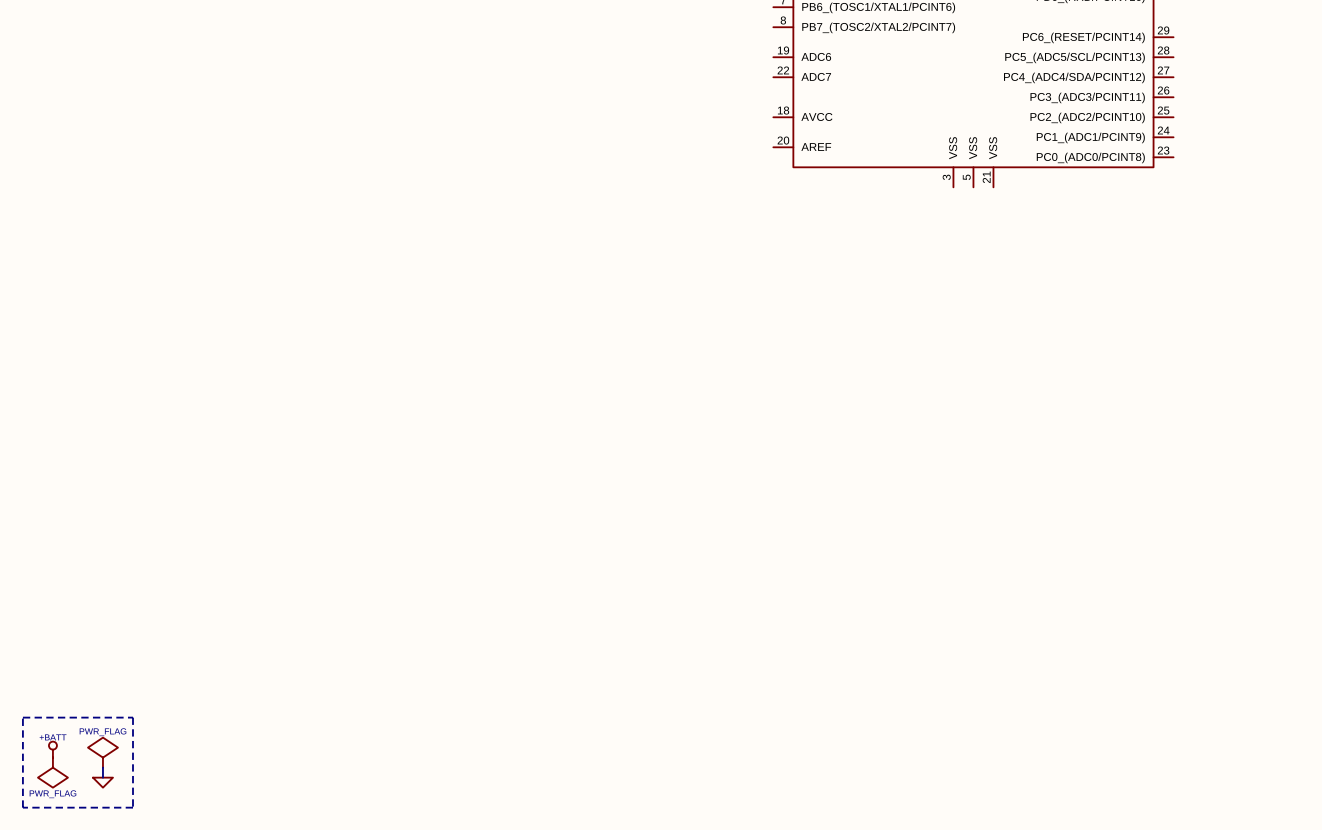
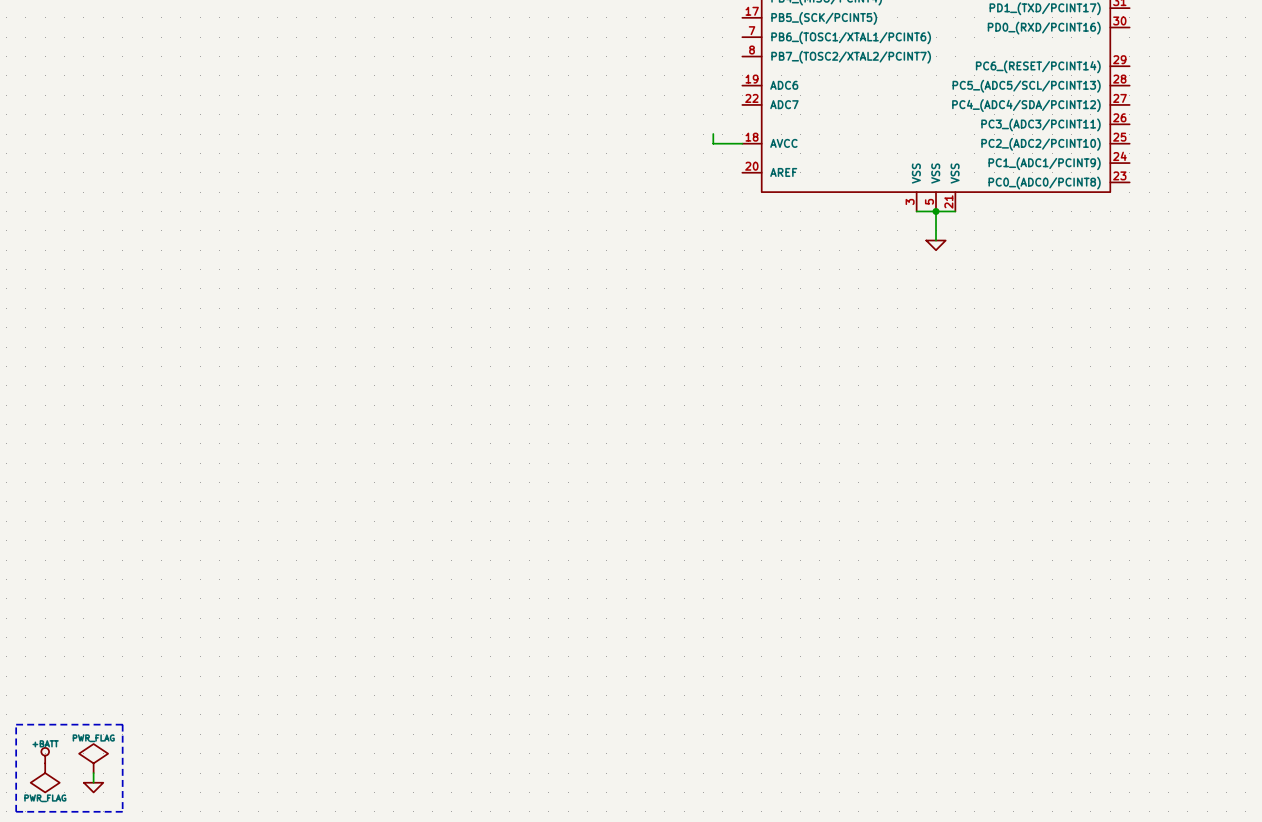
wire: none -> (713, 134) (713, 143) (742, 143)
wire: none -> (916, 211) (955, 211)
wire: none -> (936, 211) (936, 240)
junction: none -> (936, 211)
power symbol: none -> (936, 245)

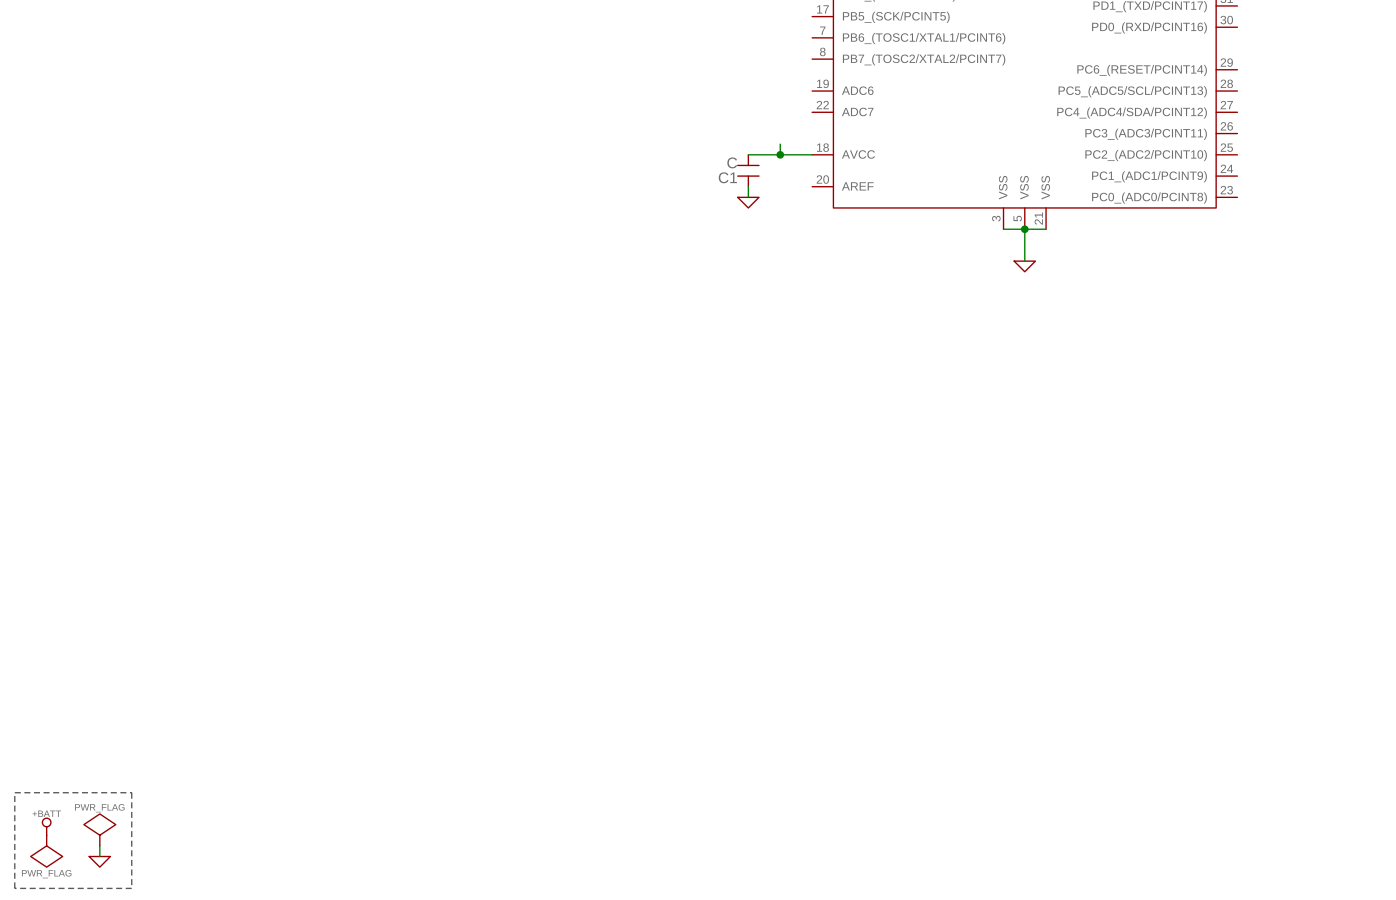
wire: none -> (748, 154) (780, 154)
junction: none -> (780, 154)
C1: none -> C (748, 170)
wire: none -> (748, 186) (748, 197)
power symbol: none -> (748, 202)

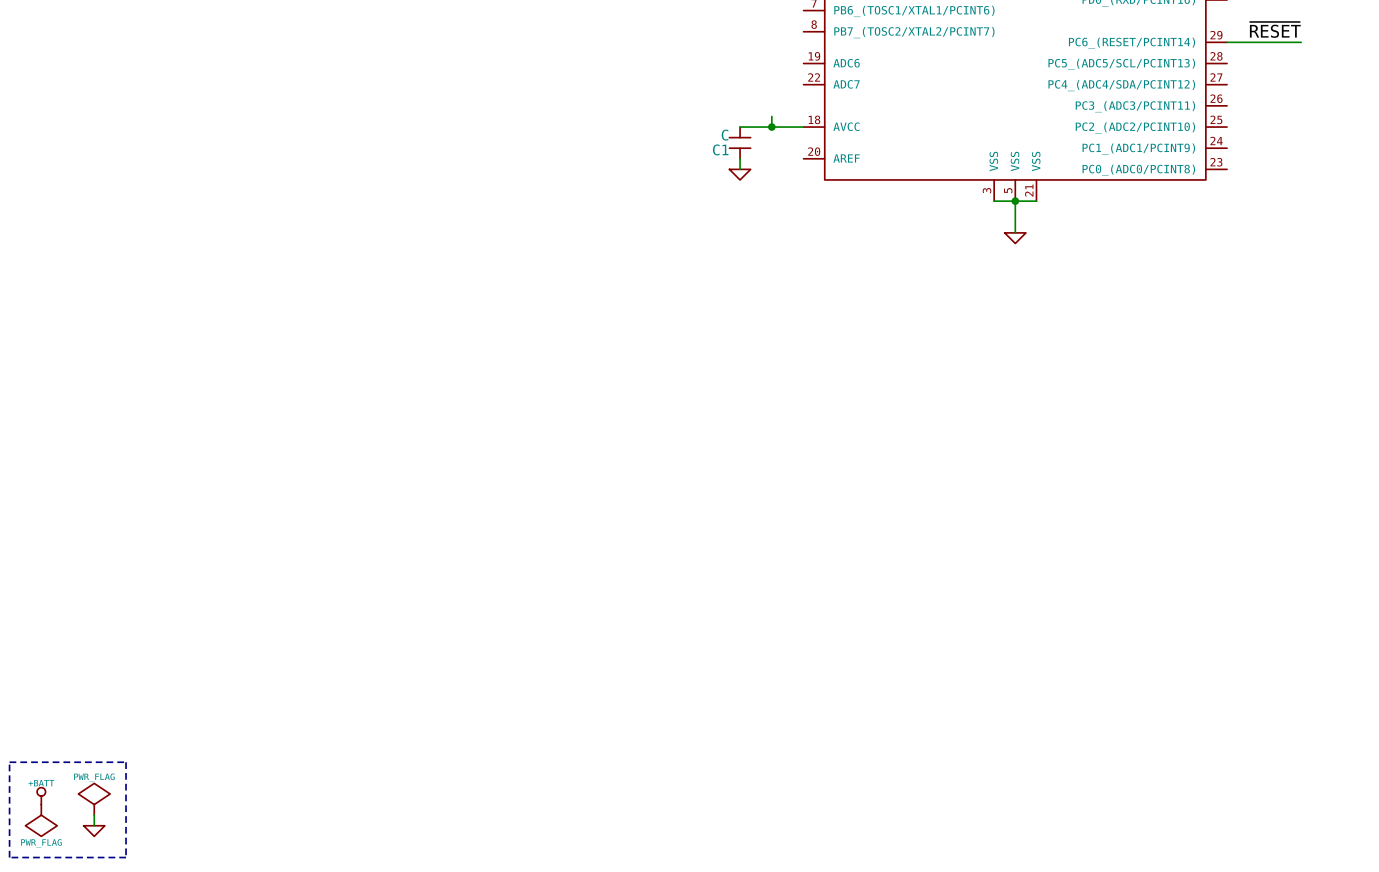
label: none -> ~{RESET} (1275, 29)
wire: none -> (1227, 42) (1301, 42)

